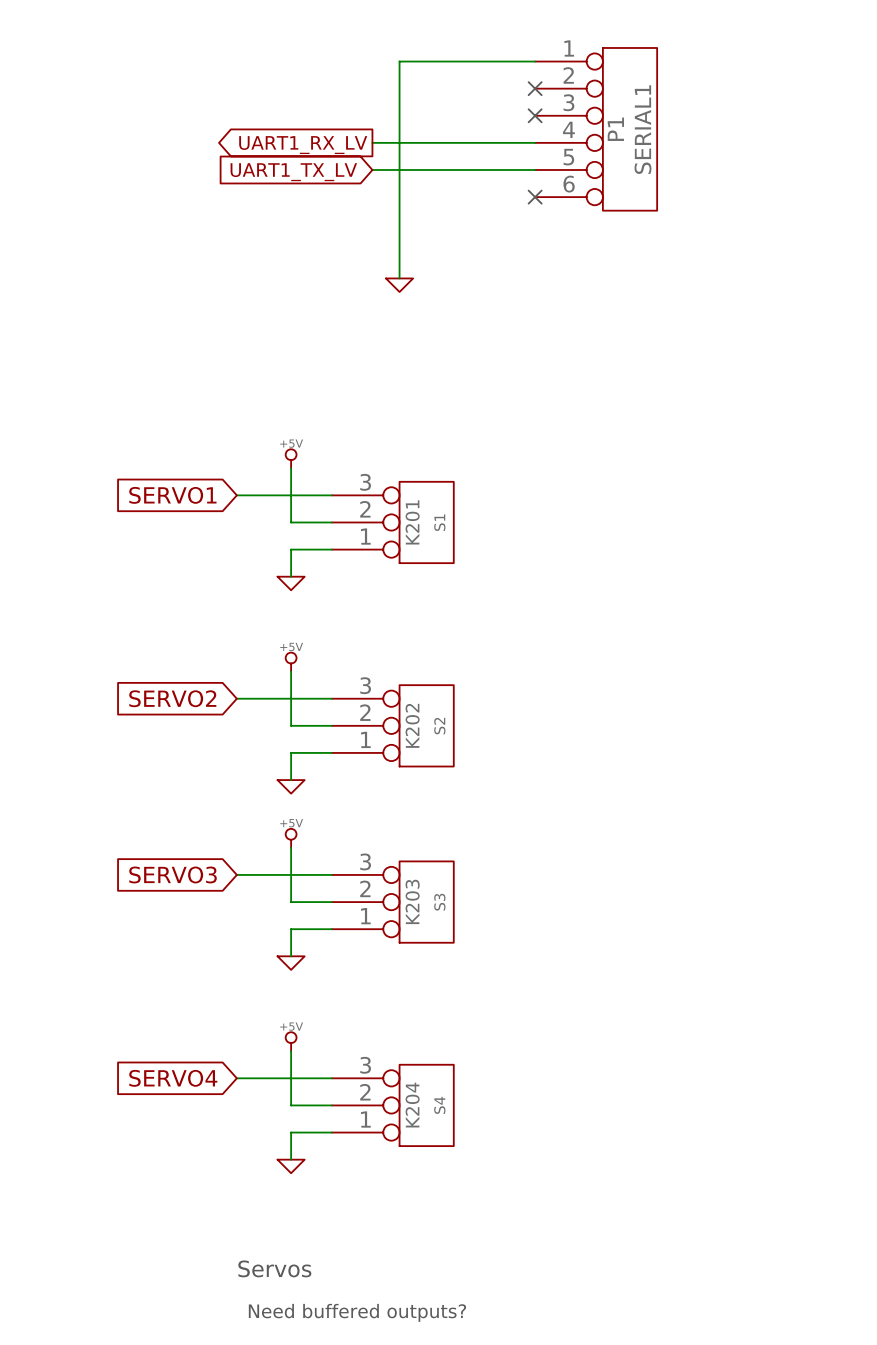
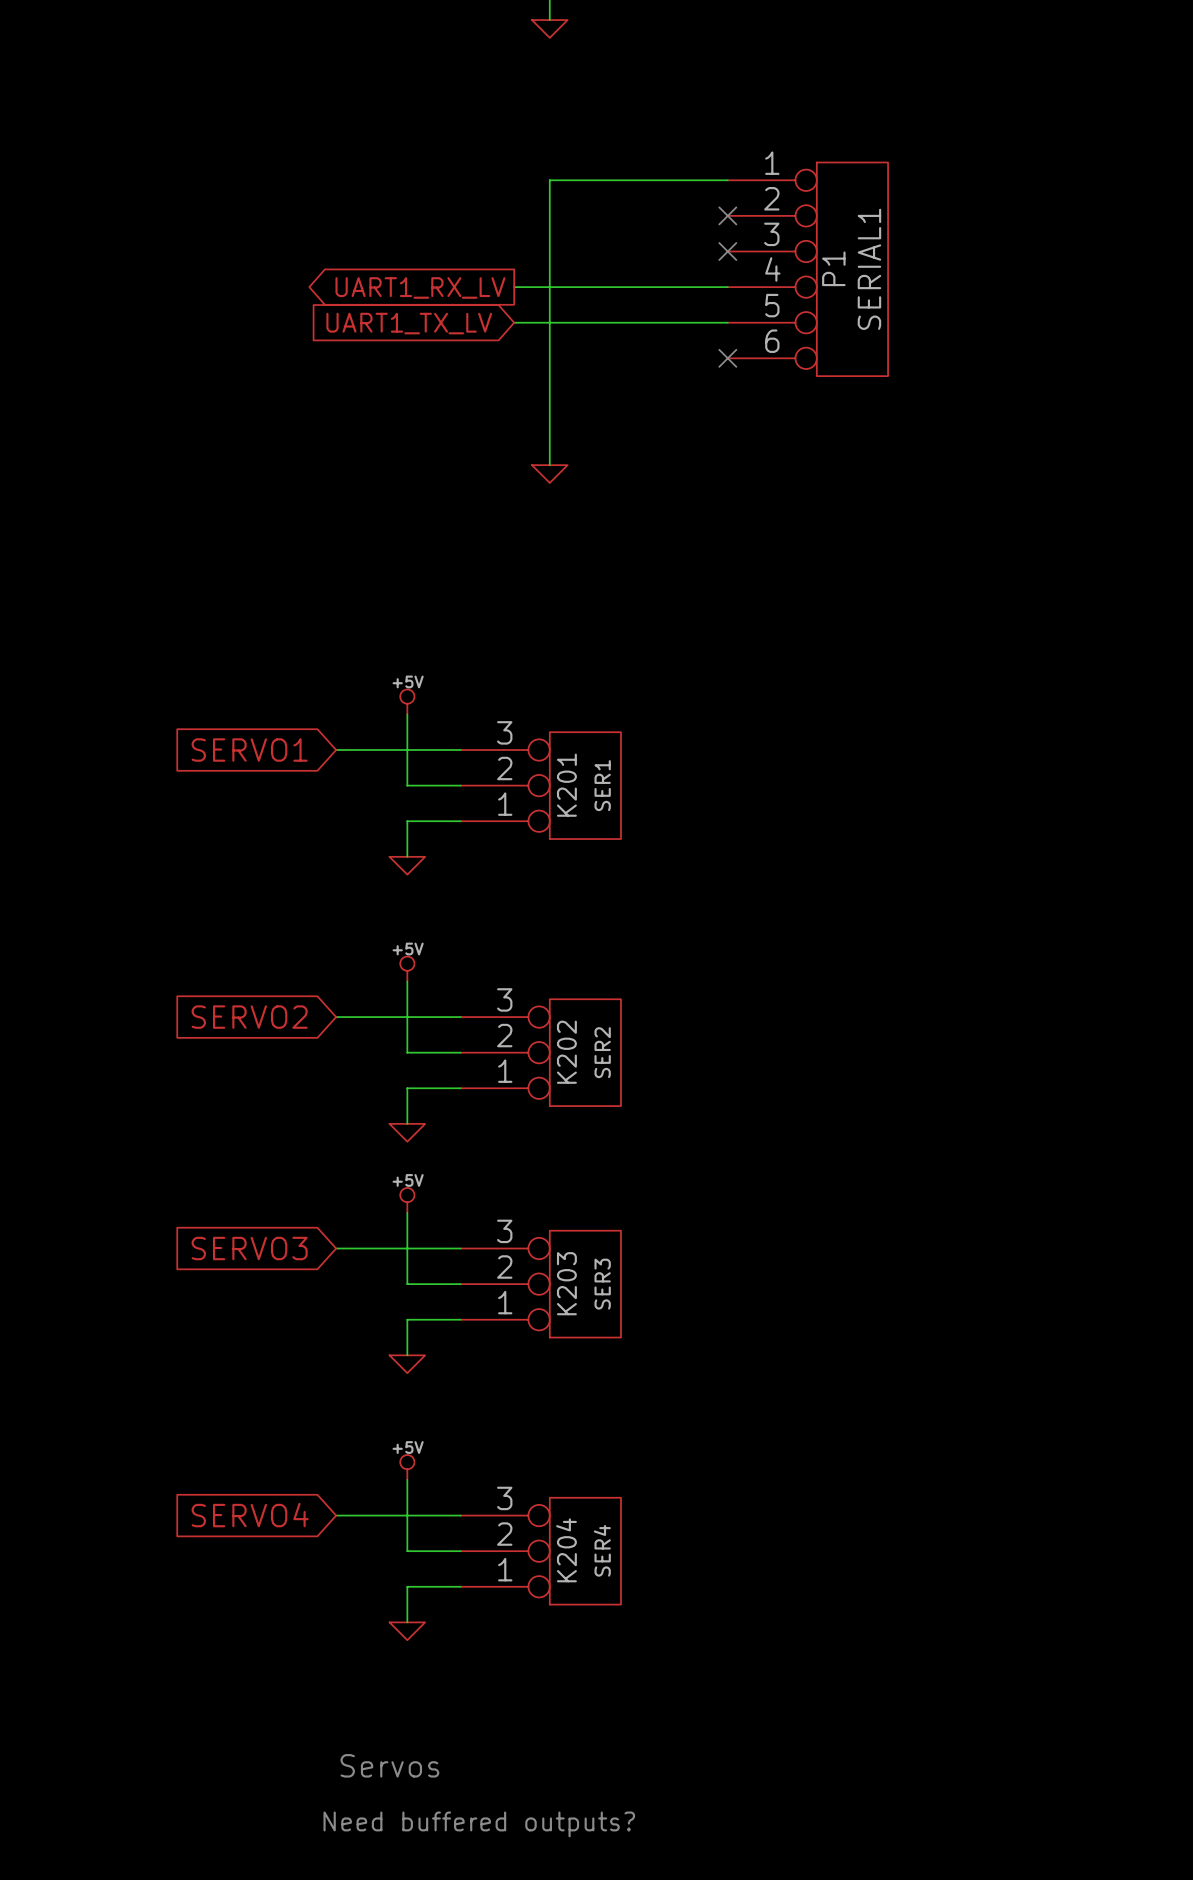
K201 value: S1 (439, 522) -> SER1 (602, 785)
K202 value: S2 (439, 726) -> SER2 (602, 1052)
K203 value: S3 (439, 902) -> SER3 (602, 1284)
K204 value: S4 (439, 1105) -> SER4 (602, 1550)

